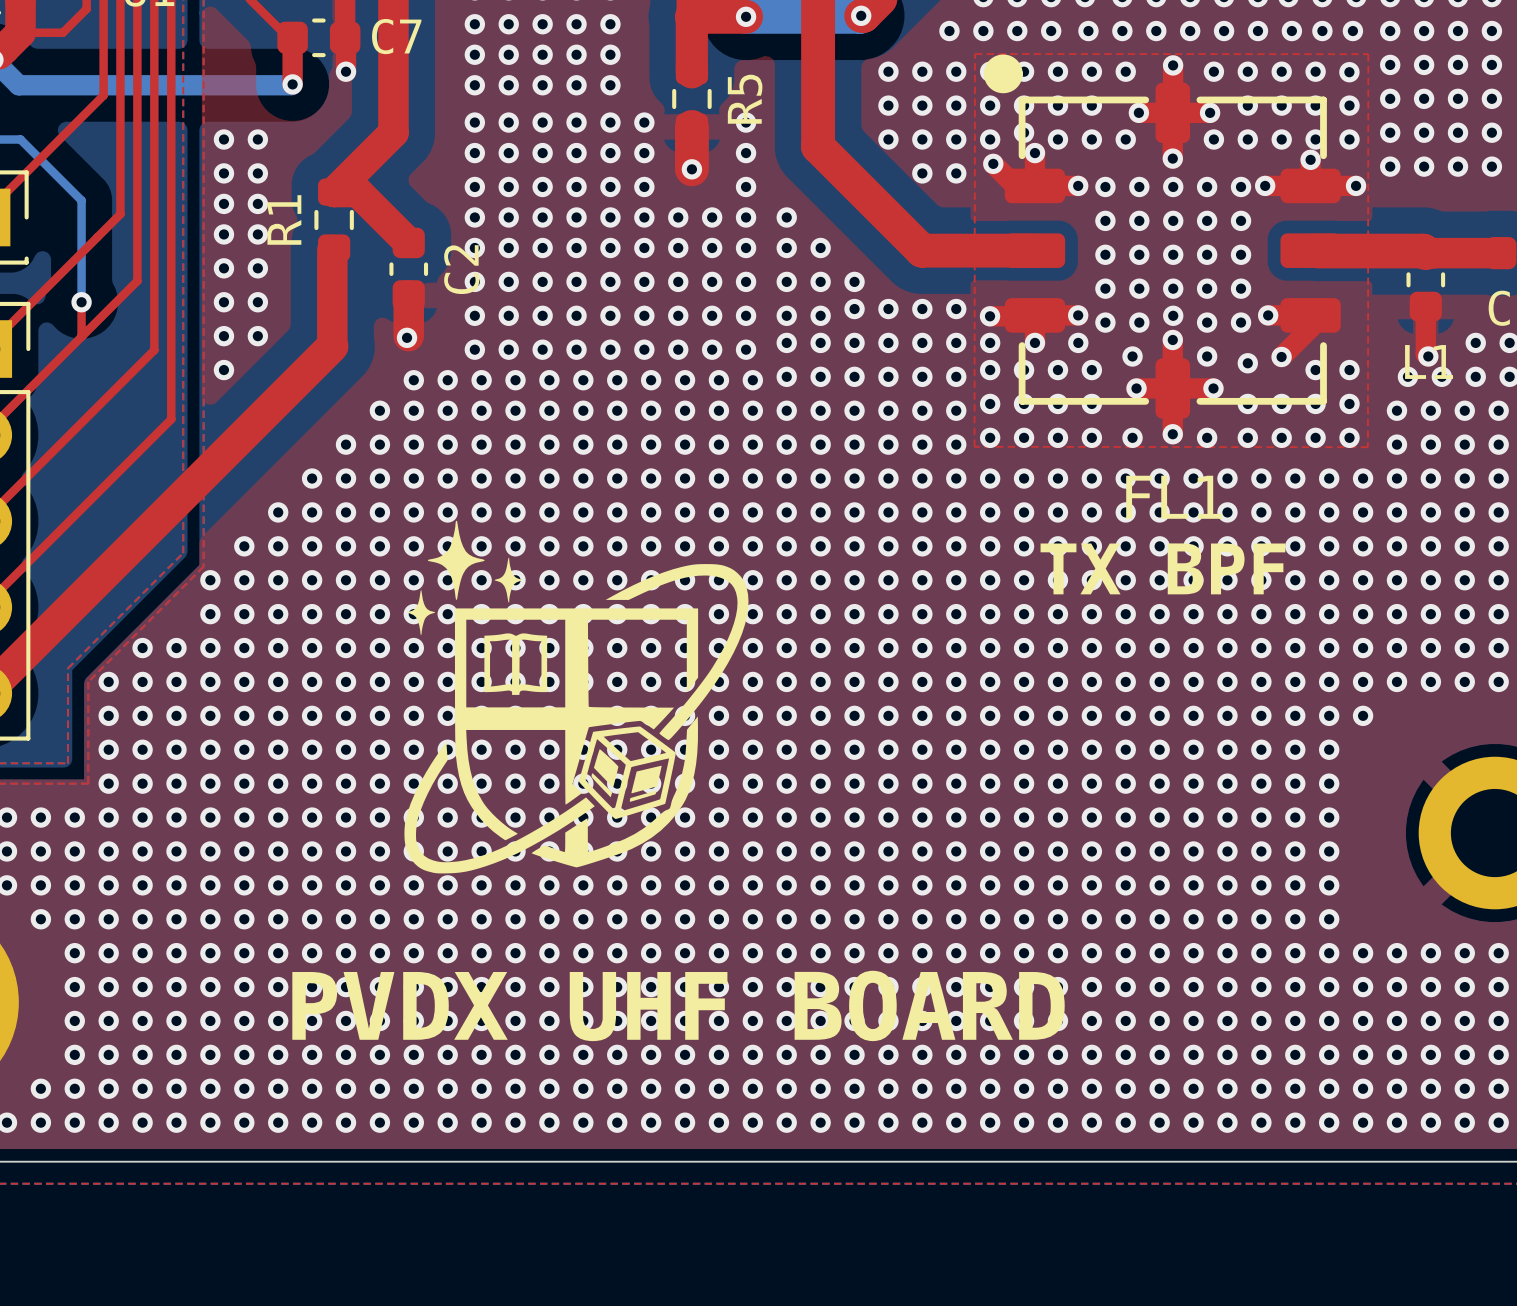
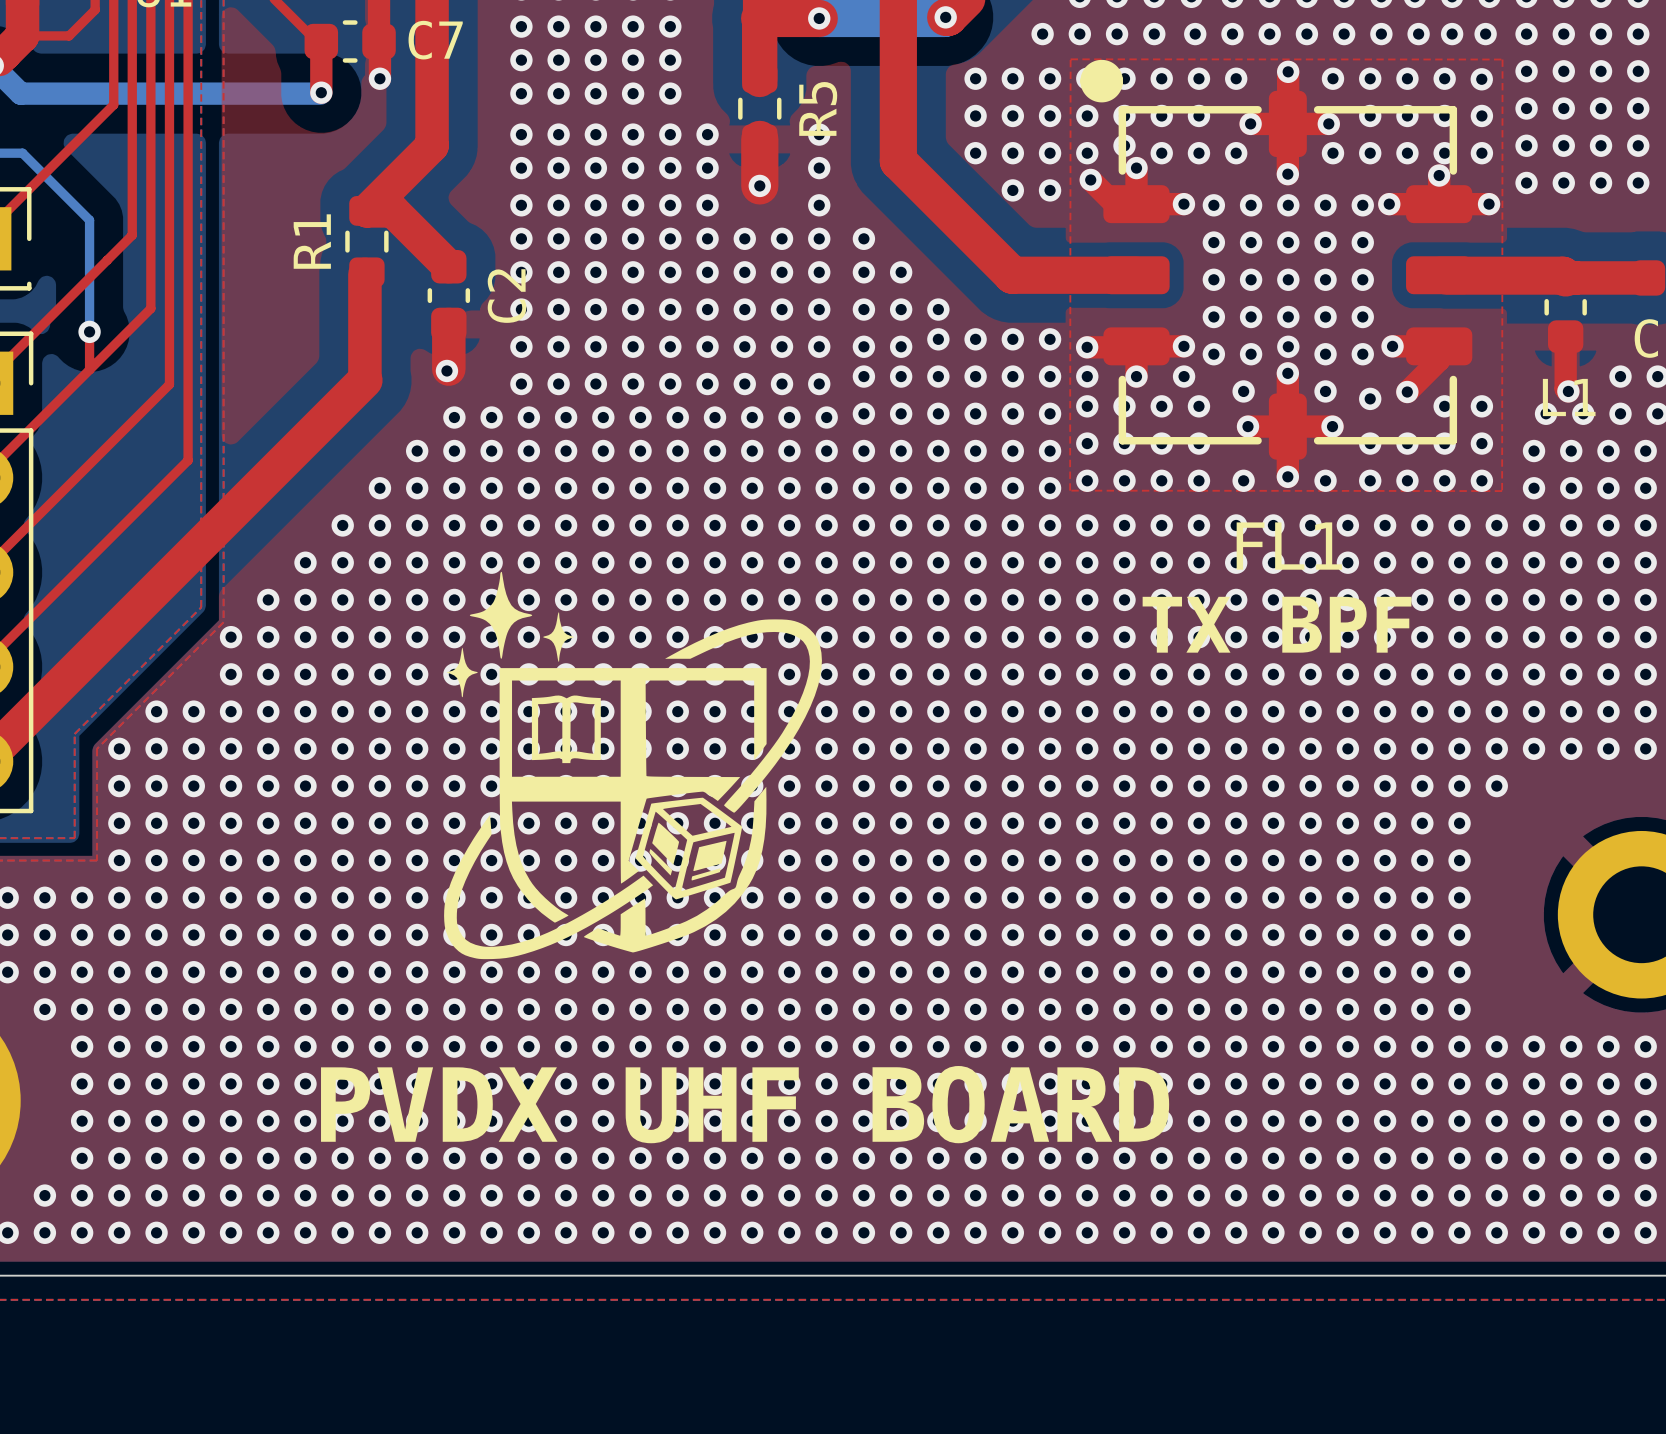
via: (223, 139) -> none
via: (257, 139) -> none
via: (223, 173) -> none
via: (257, 173) -> none
via: (223, 203) -> none
via: (257, 203) -> none
via: (223, 234) -> none
via: (257, 234) -> none
via: (223, 268) -> none
via: (257, 268) -> none
via: (223, 302) -> none
via: (257, 302) -> none
via: (223, 336) -> none
via: (257, 336) -> none
via: (223, 370) -> none

